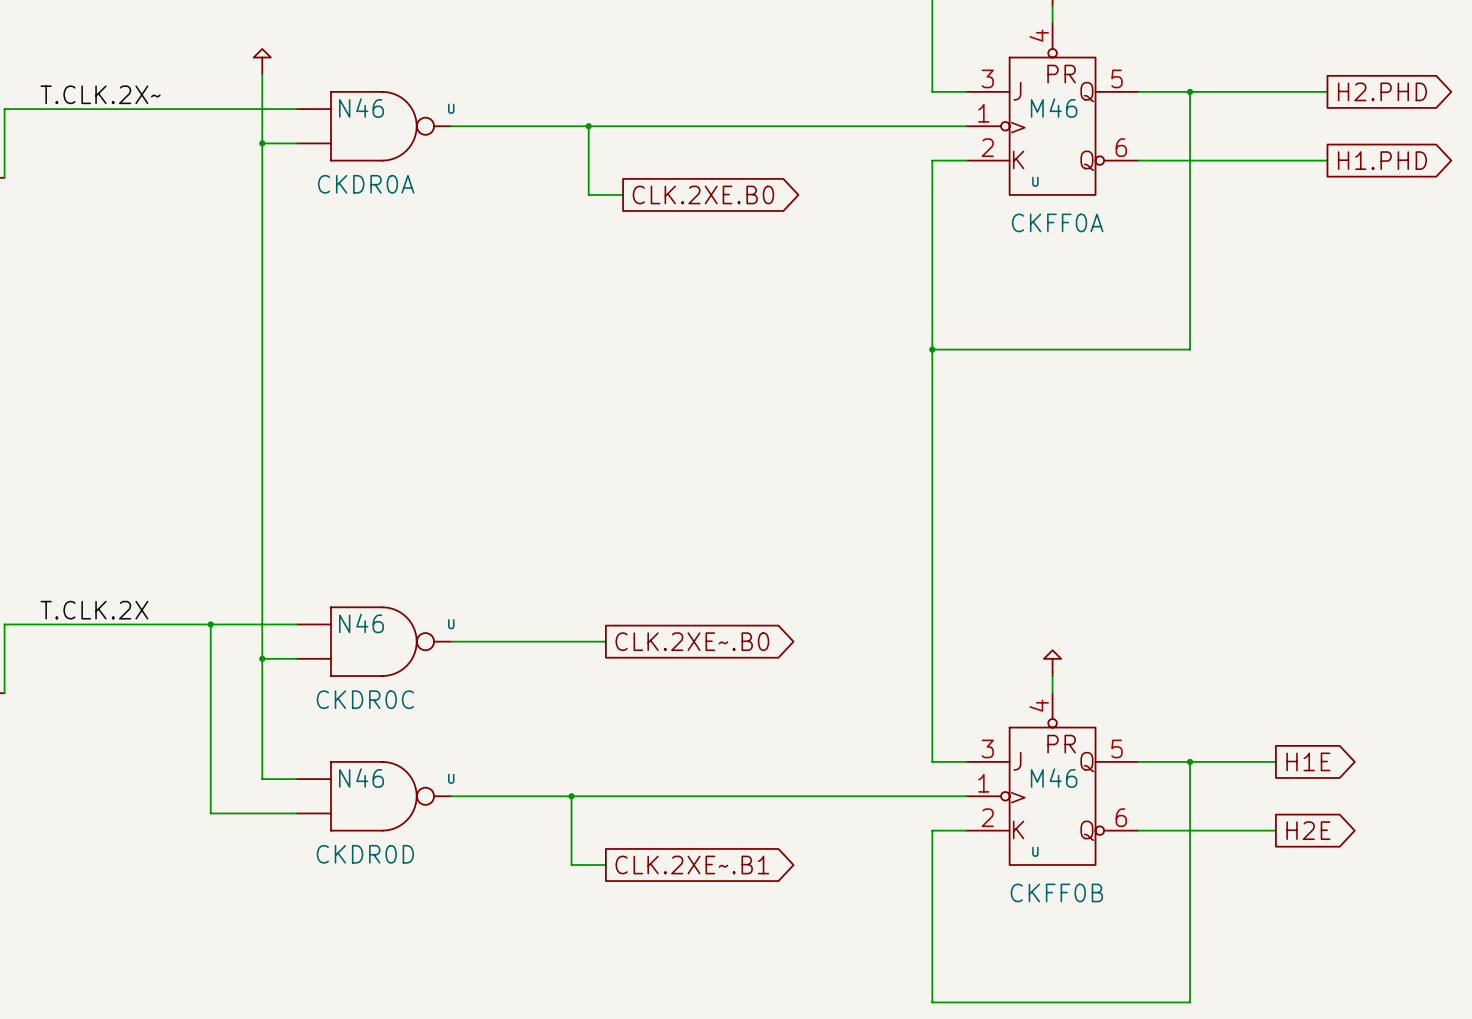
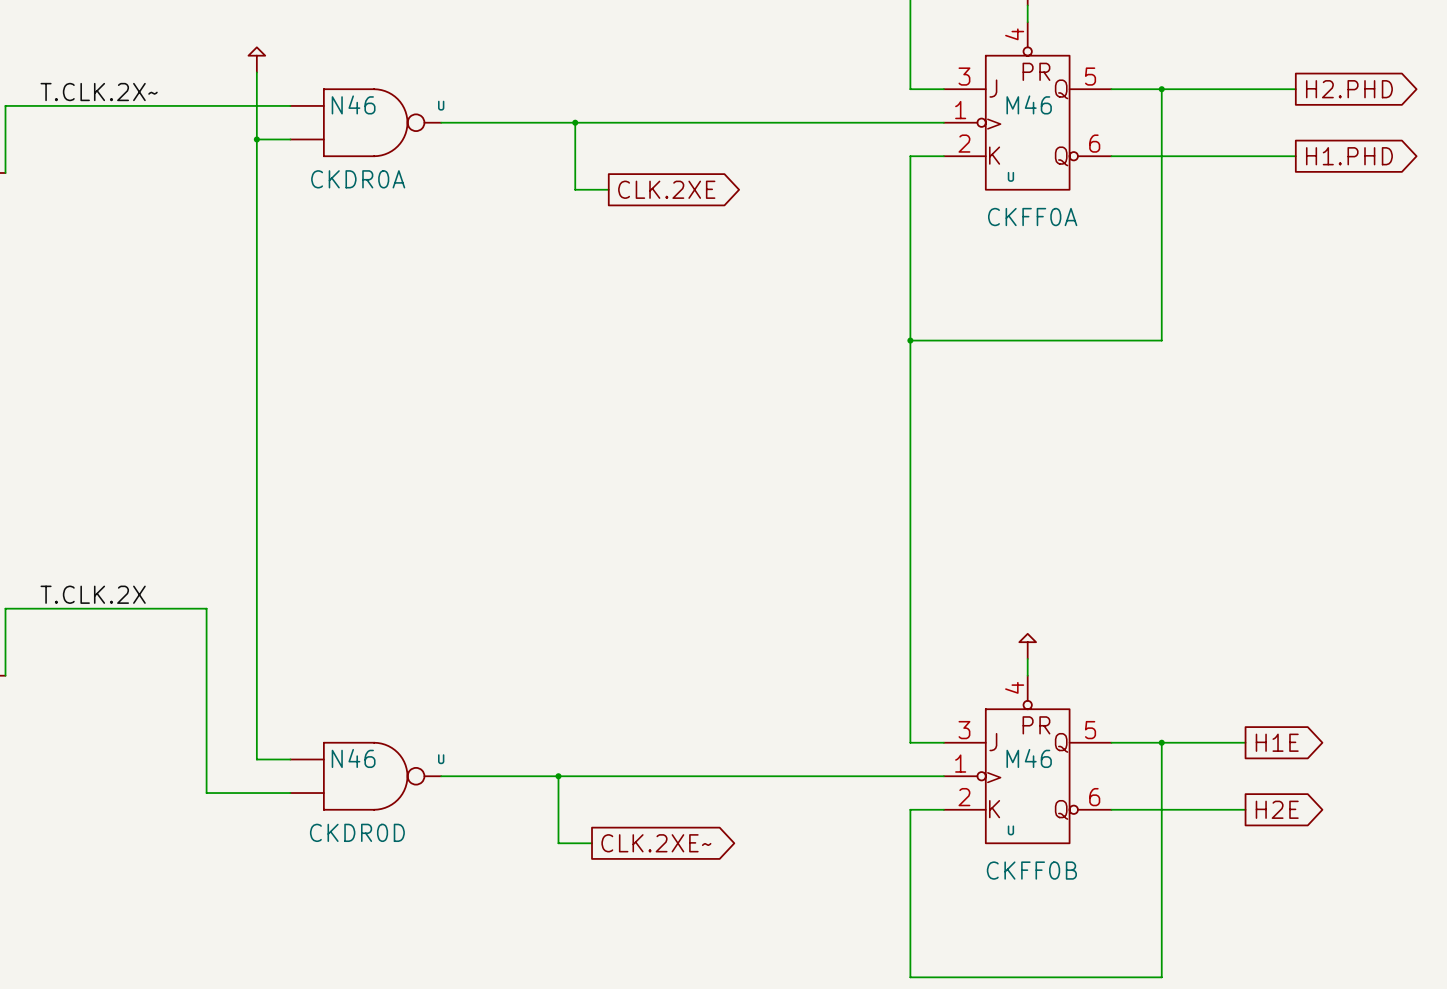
global label: CLK.2XE.B0 (703, 194) -> CLK.2XE (666, 189)
wire: (210, 624) (296, 624) -> none
junction: (210, 624) -> none
U: (373, 641) -> none
wire: (451, 641) (605, 641) -> none
global label: CLK.2XE~.B0 (692, 641) -> none
wire: (262, 658) (296, 658) -> none
junction: (262, 658) -> none
global label: CLK.2XE~.B1 (692, 865) -> CLK.2XE~ (656, 843)

